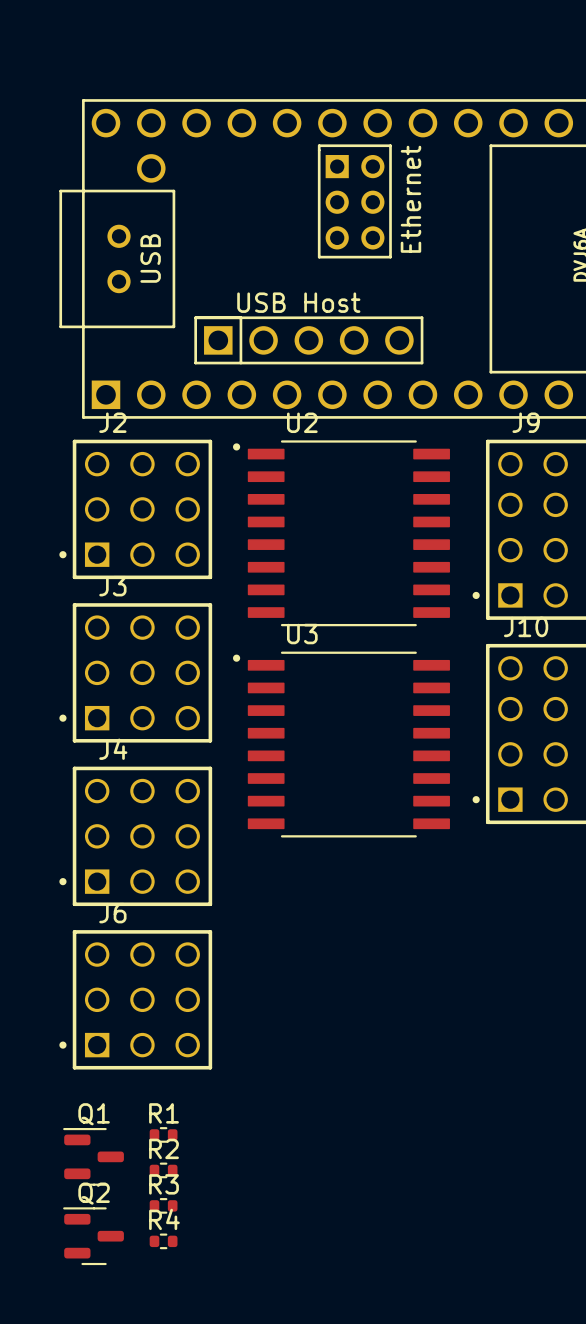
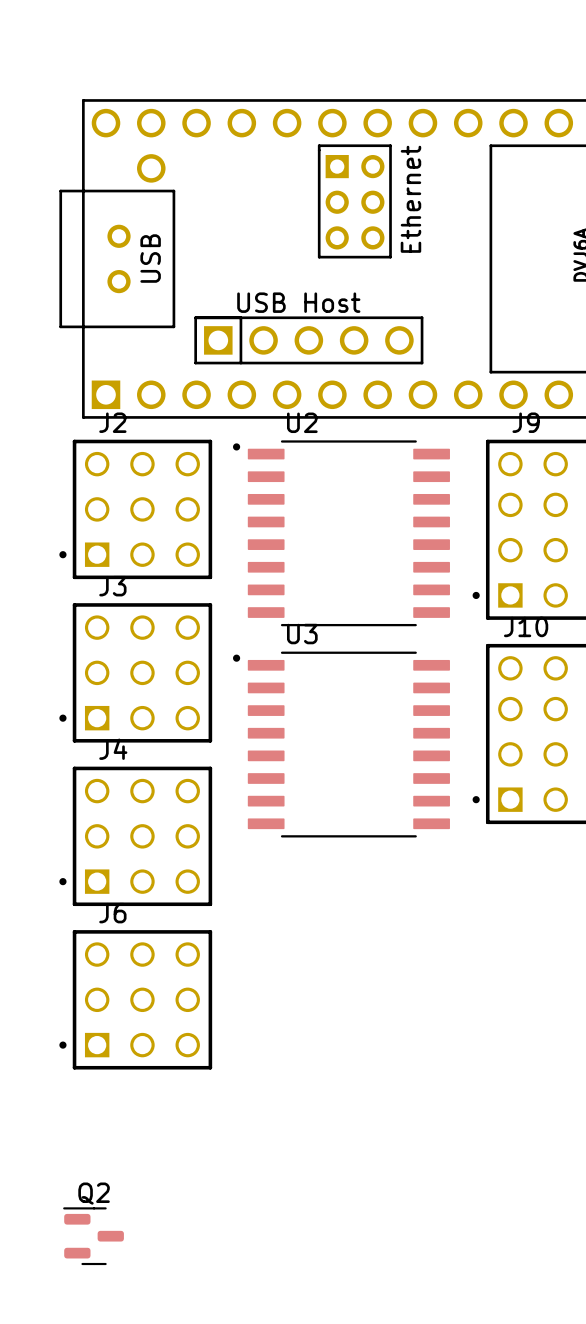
R1: (163, 1134) -> none
Q1: (93, 1156) -> none
R2: (163, 1170) -> none
R3: (163, 1205) -> none
R4: (163, 1241) -> none

